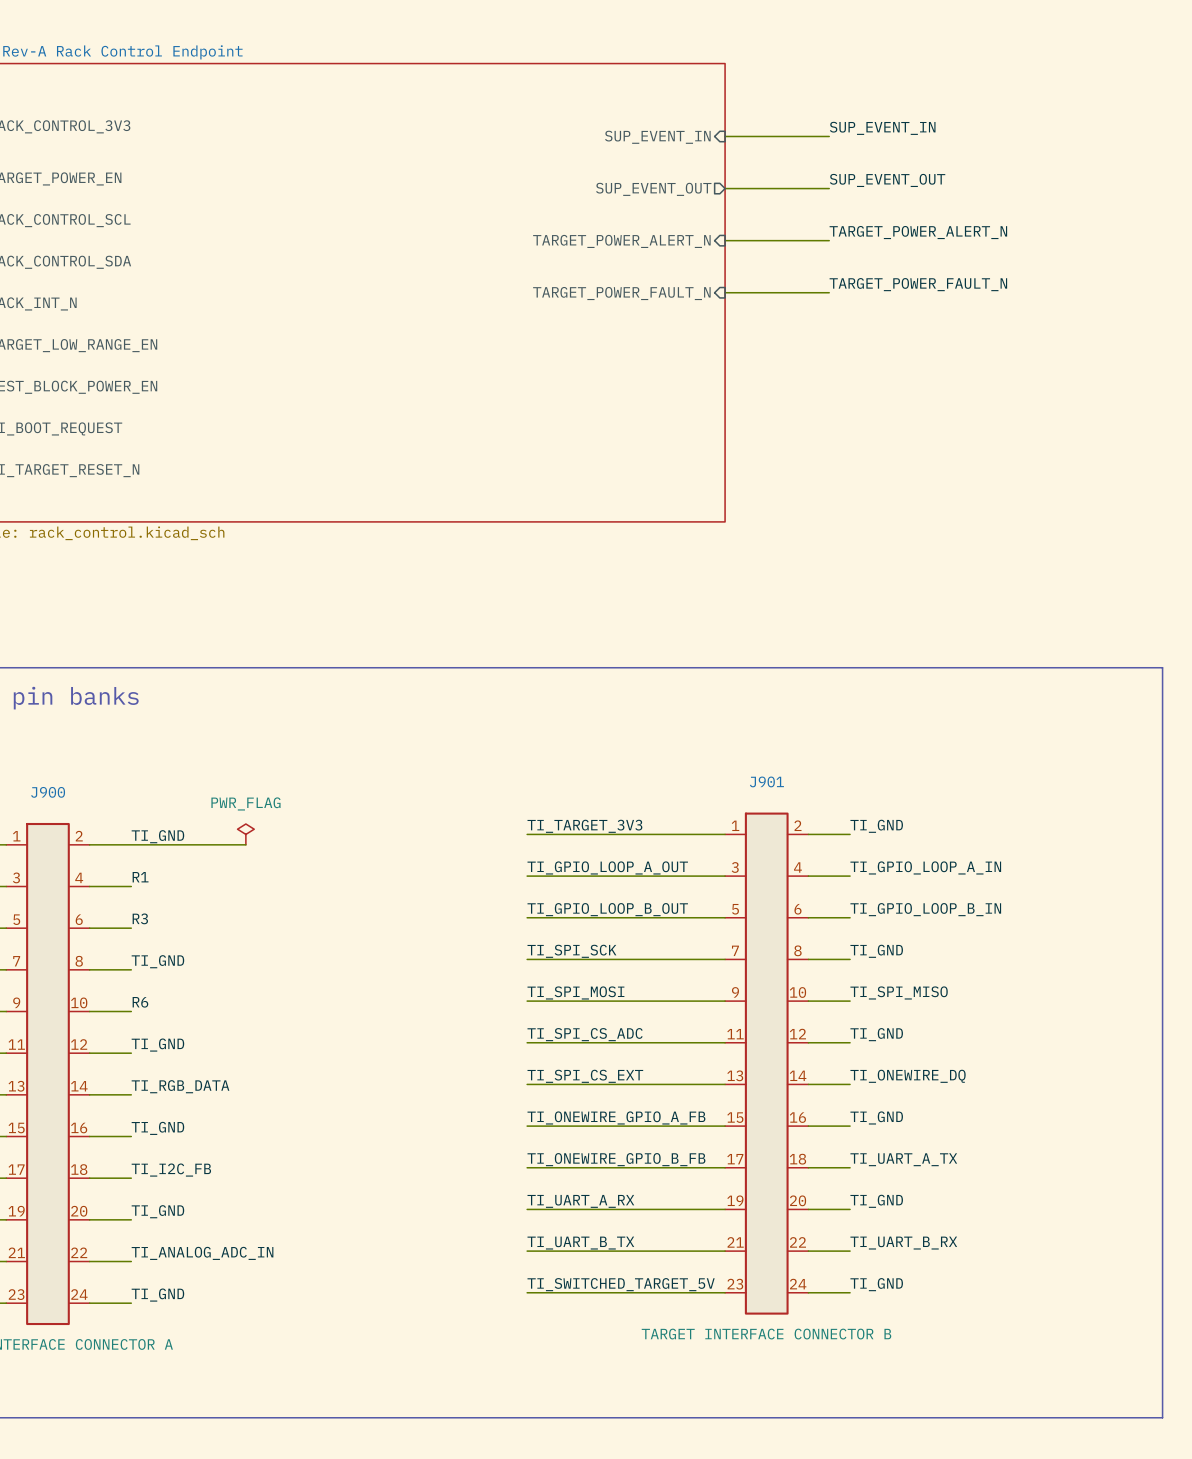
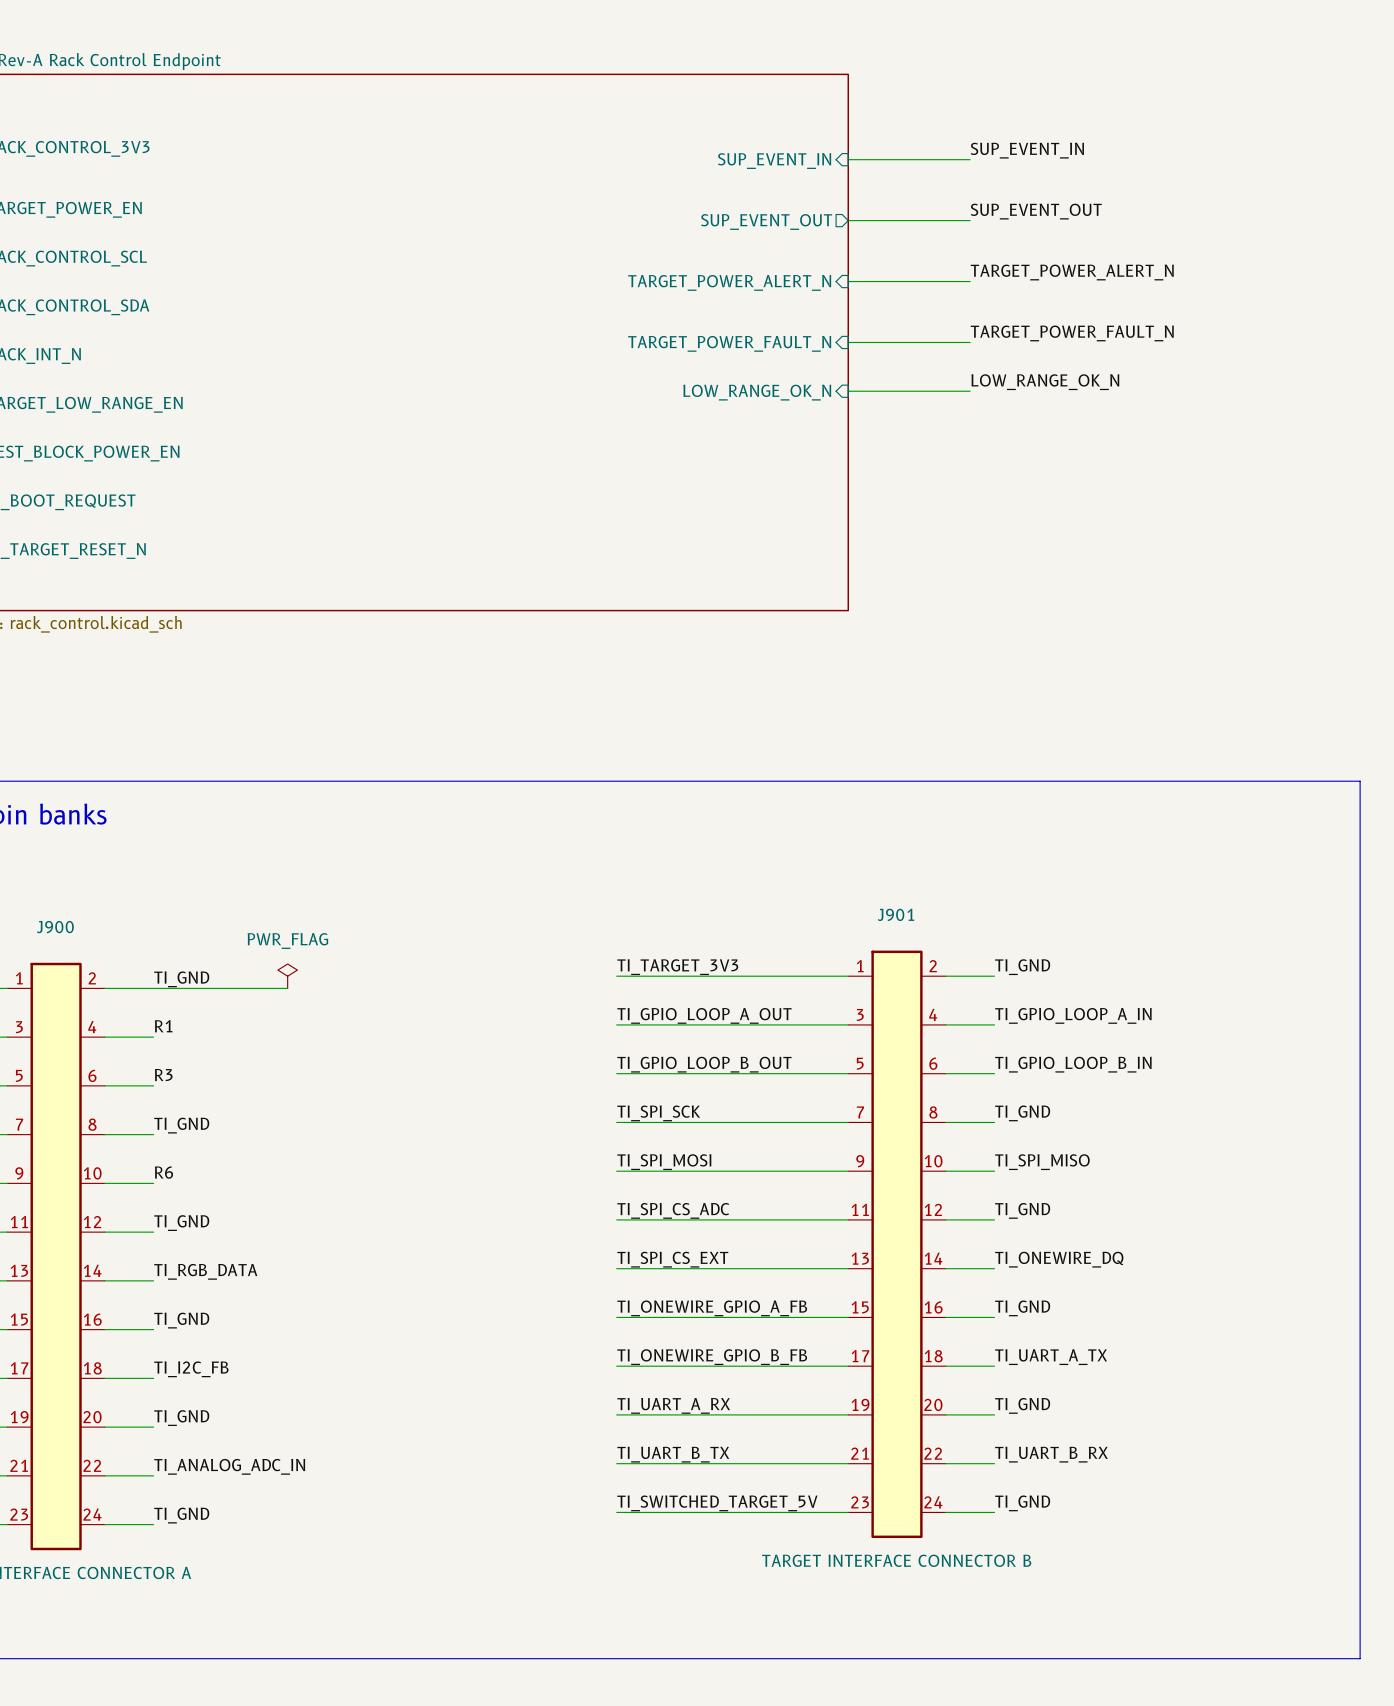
label: none -> LOW_RANGE_OK_N (1045, 382)
wire: none -> (848, 391) (970, 391)
sheet pin: none -> LOW_RANGE_OK_N (757, 392)

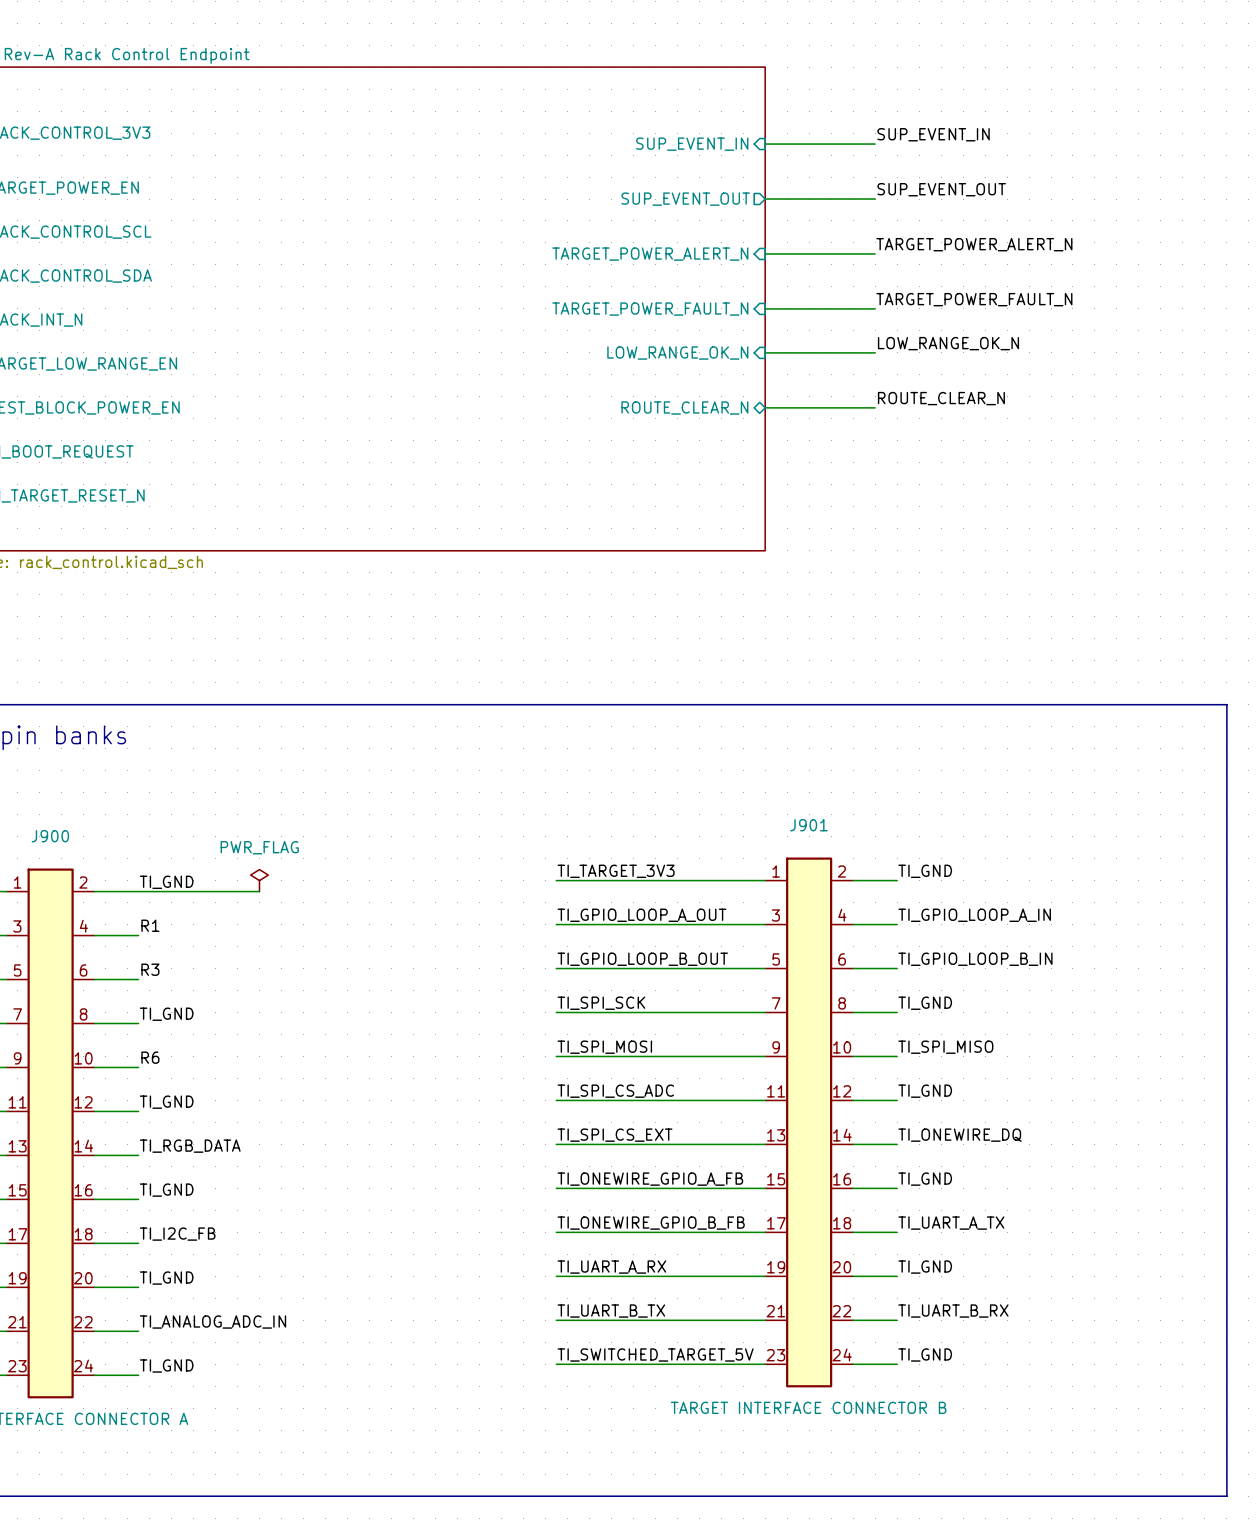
label: none -> ROUTE_CLEAR_N (941, 398)
wire: none -> (765, 407) (875, 407)
sheet pin: none -> ROUTE_CLEAR_N (684, 407)

